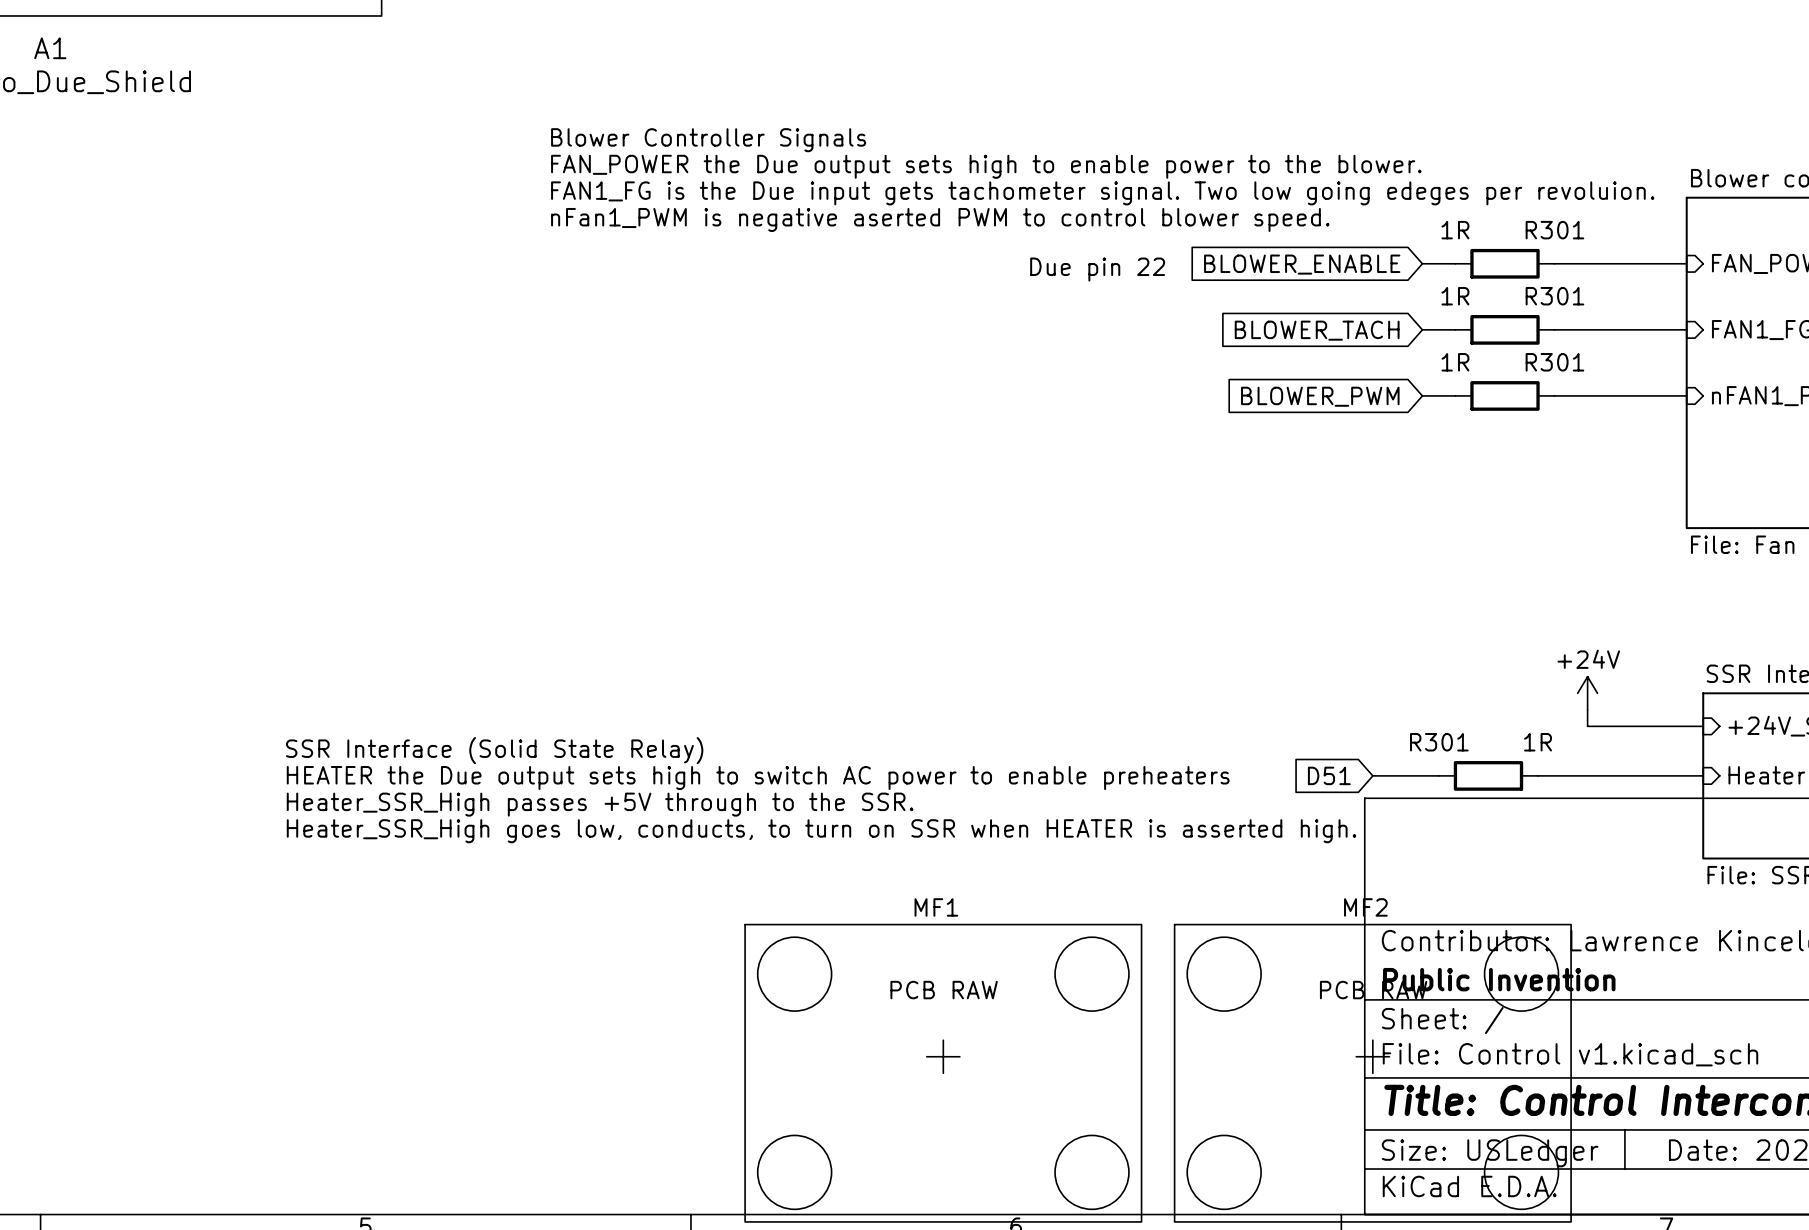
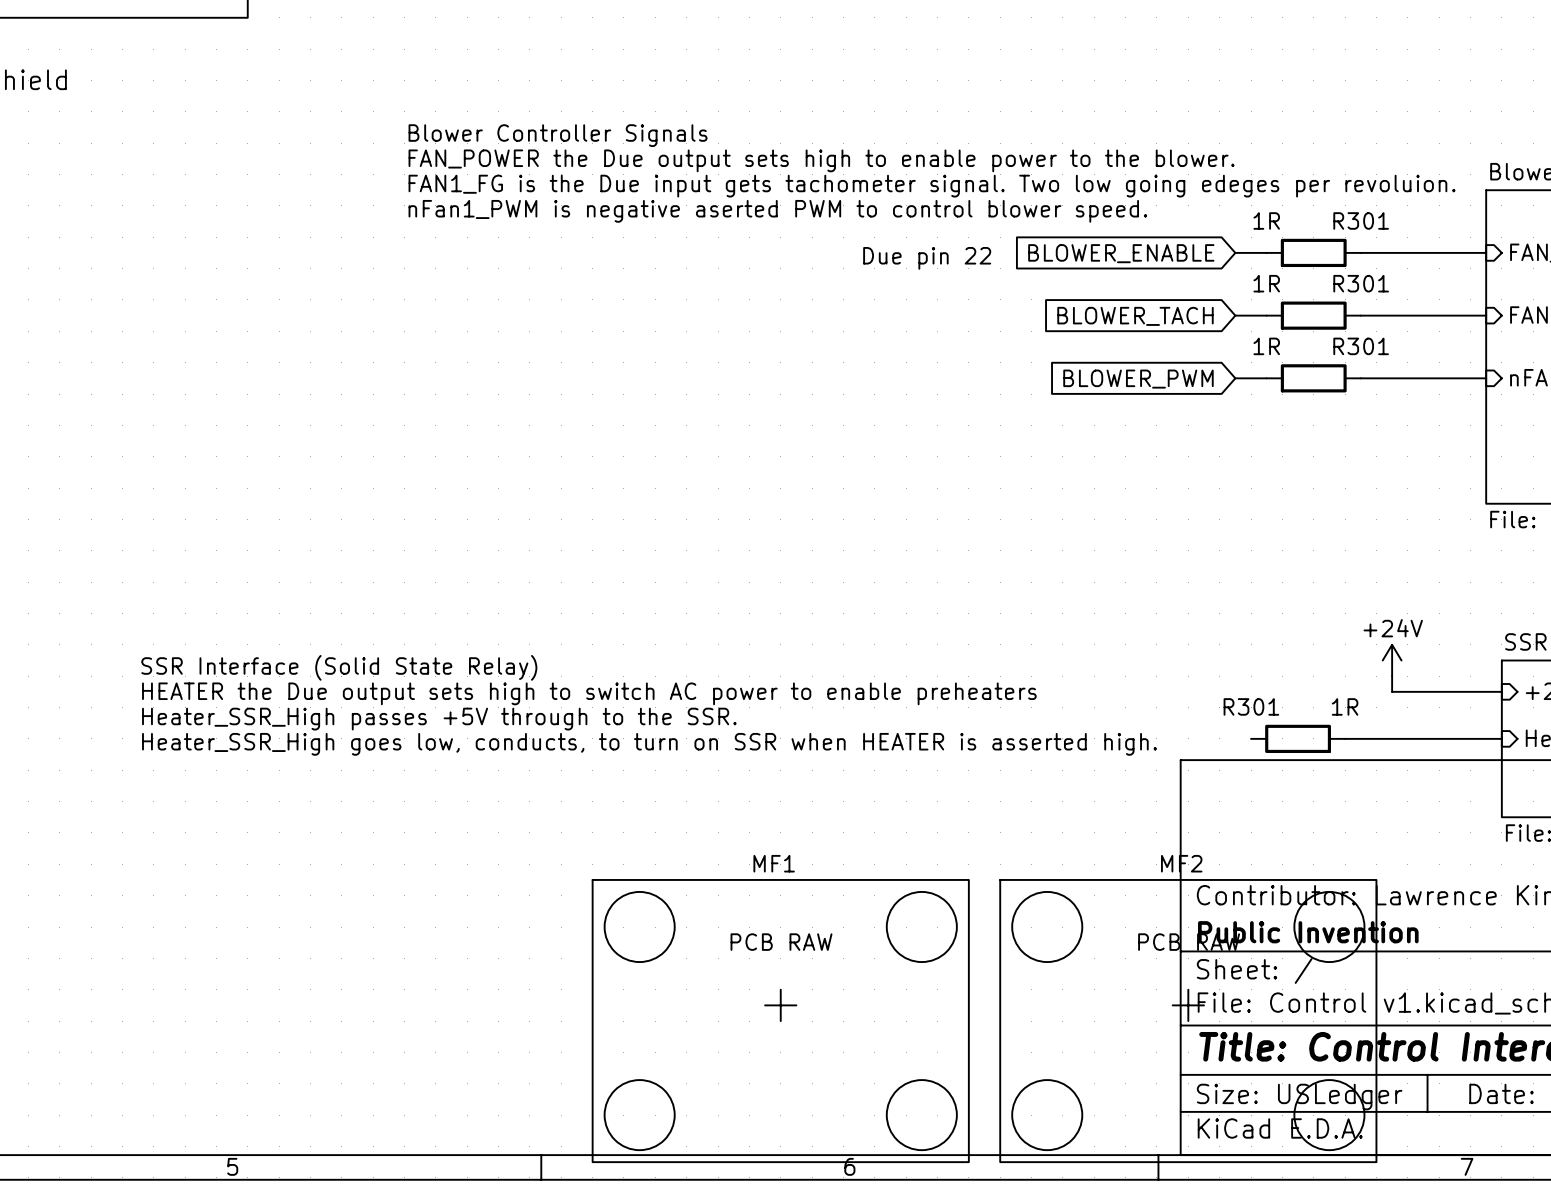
text position: SSR Interface (Solid State Relay) (494, 750) -> SSR Interface (Solid State Relay) (339, 667)
global label: D51 (1329, 775) -> none
wire: (1372, 775) (1438, 775) -> none
text position: HEATER the Due output sets high to switch AC power to enable preheaters (758, 778) -> HEATER the Due output sets high to switch AC power to enable preheaters (589, 693)
text position: Heater_SSR_High passes +5V through to the SSR. (600, 804) -> Heater_SSR_High passes +5V through to the SSR. (439, 719)
text position: Heater_SSR_High goes low, conducts, to turn on SSR when HEATER is asserted high. (821, 831) -> Heater_SSR_High goes low, conducts, to turn on SSR when HEATER is asserted high. (649, 744)

